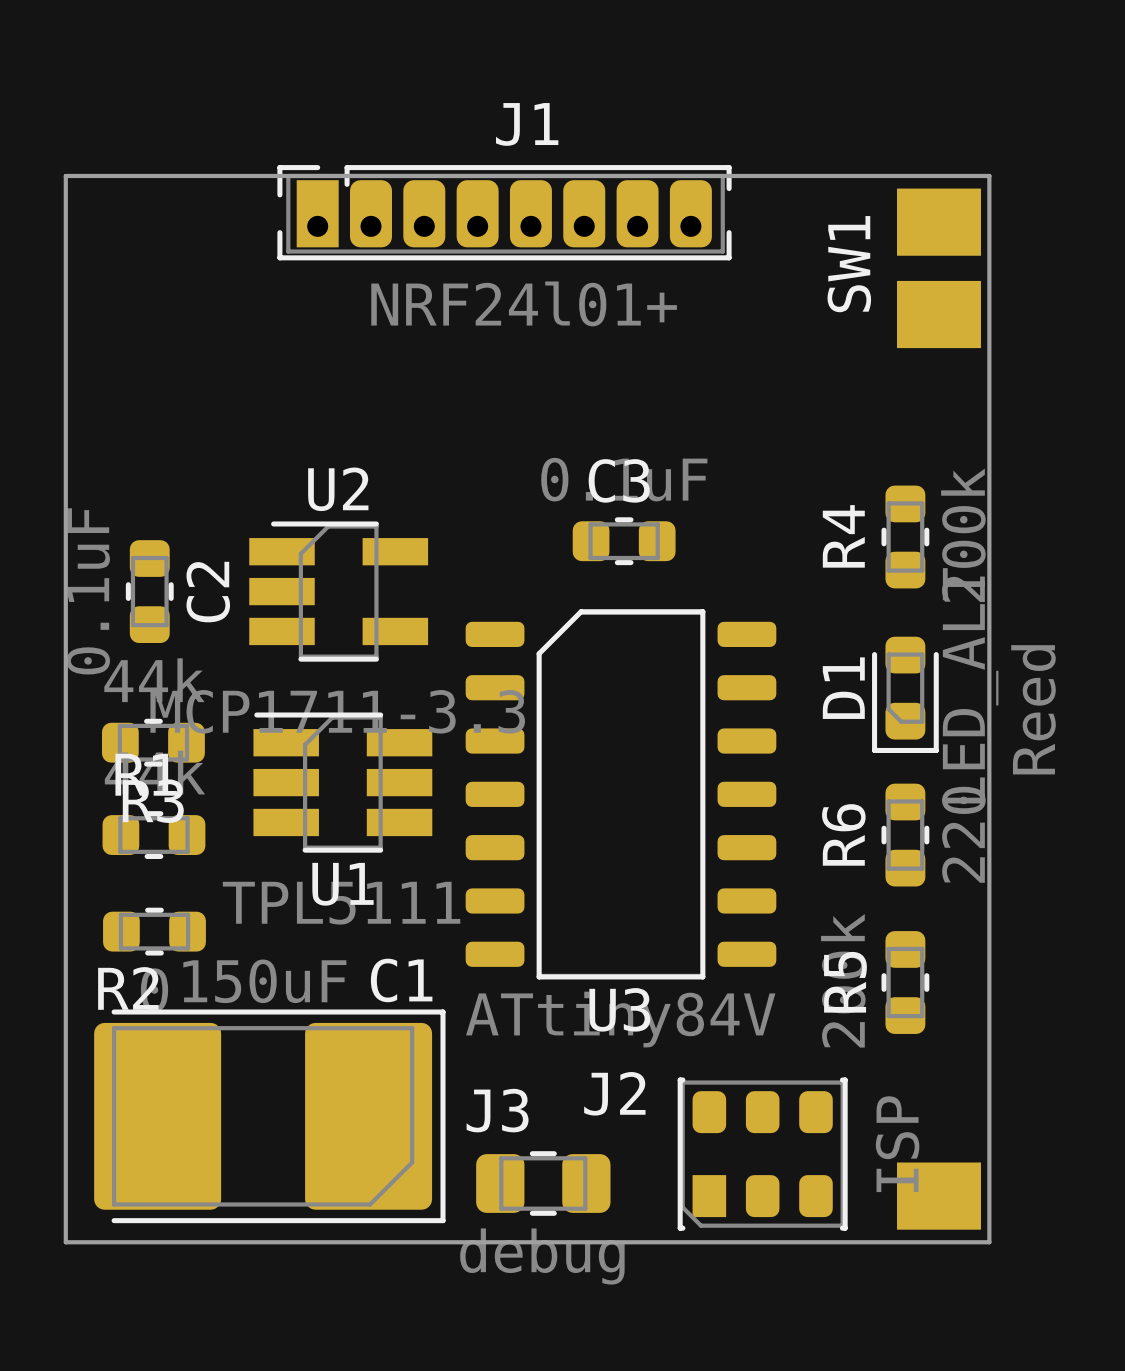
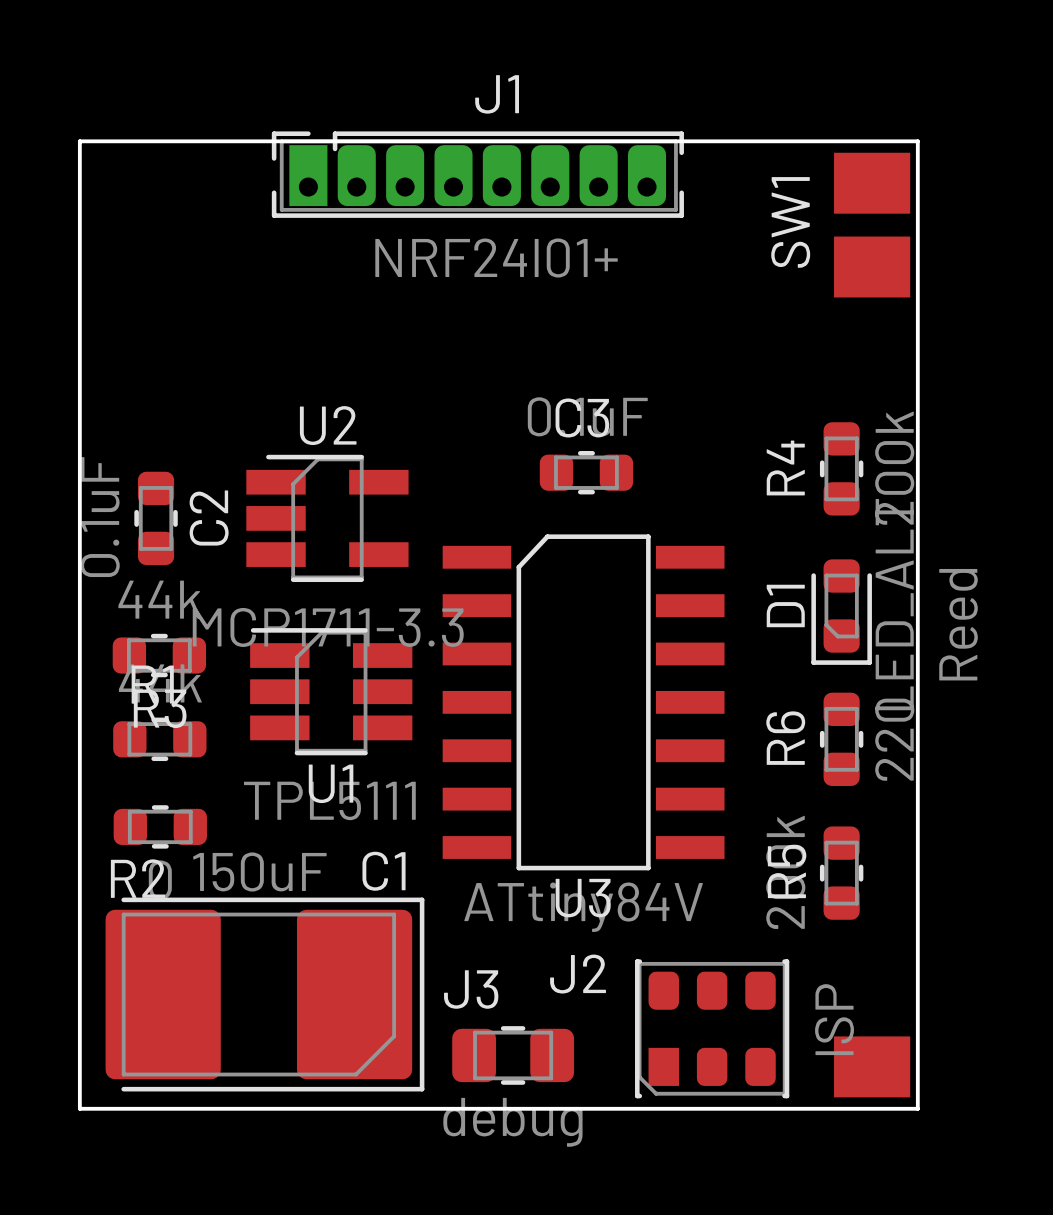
U3 footprint: [465, 609, 777, 980] -> [442, 534, 725, 871]

